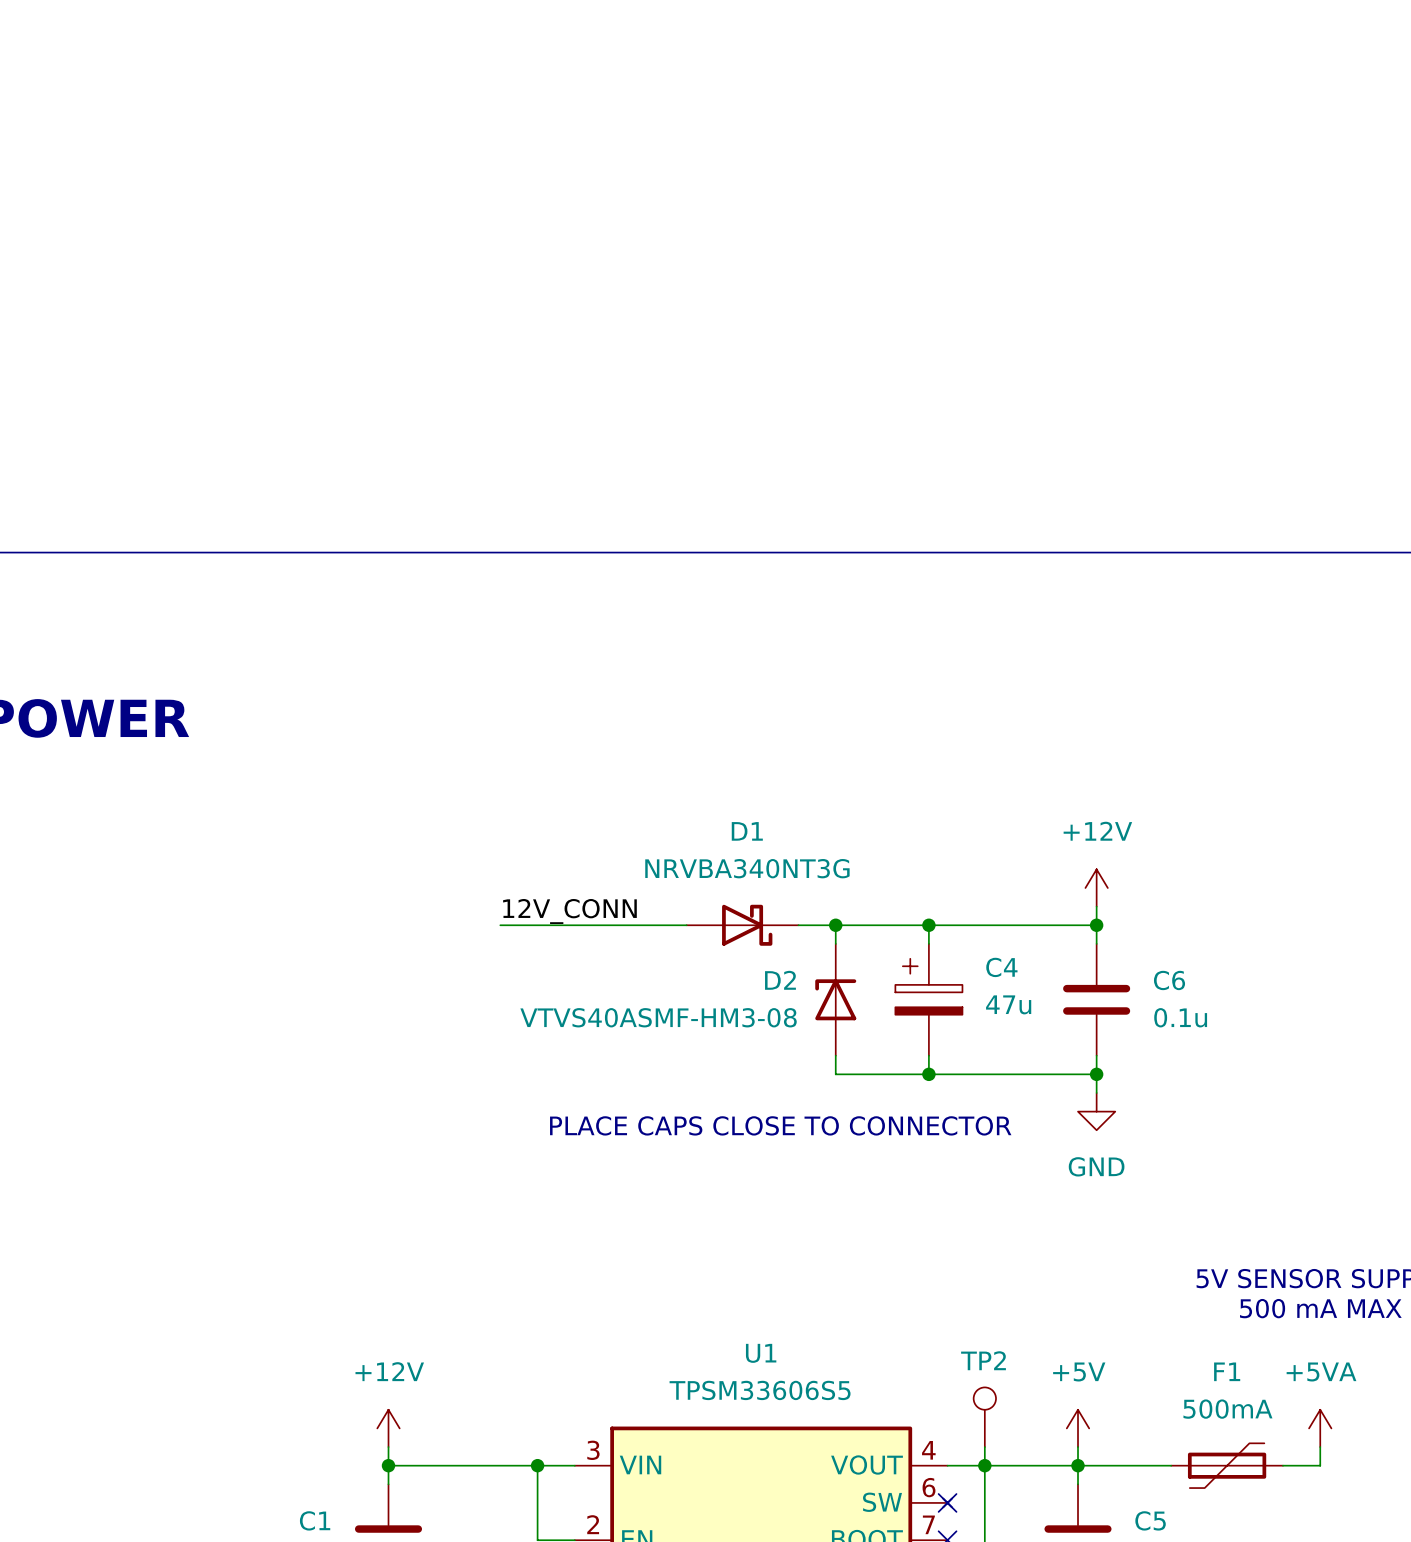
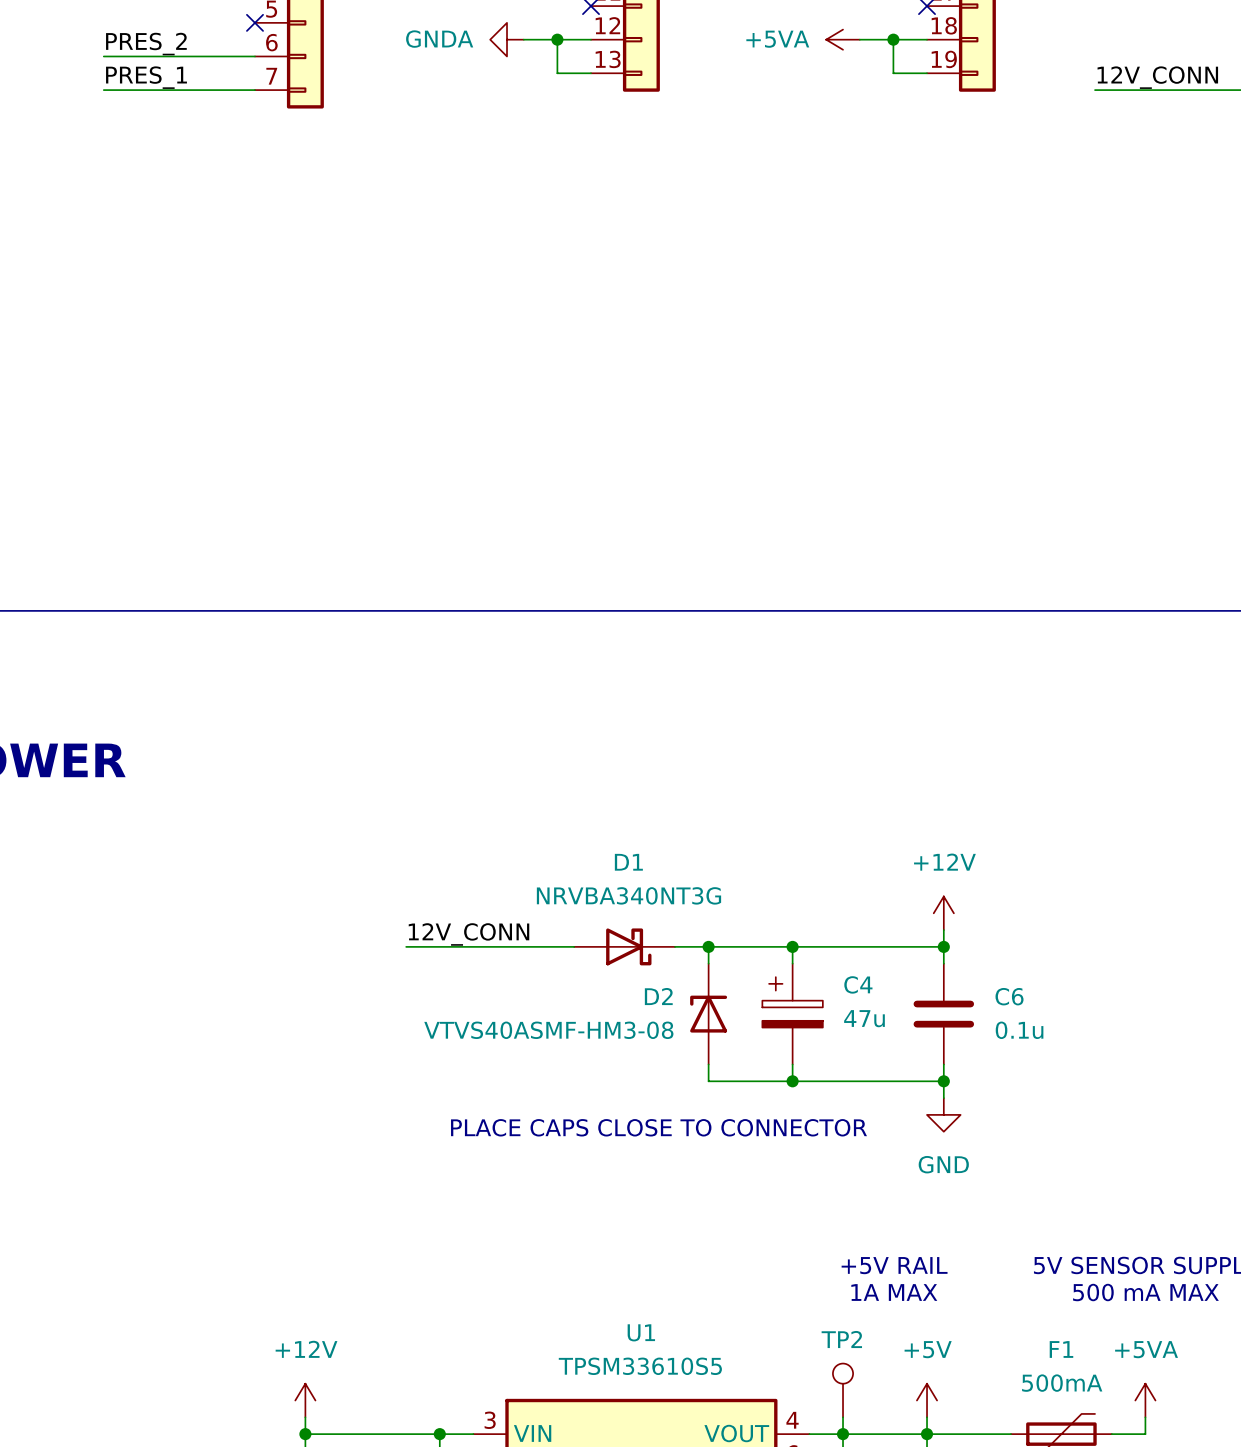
text: none -> +5V RAIL (894, 1265)
text: none -> 1A MAX (894, 1292)
U1 value: TPSM33606S5 (760, 1390) -> TPSM33610S5 (640, 1366)

